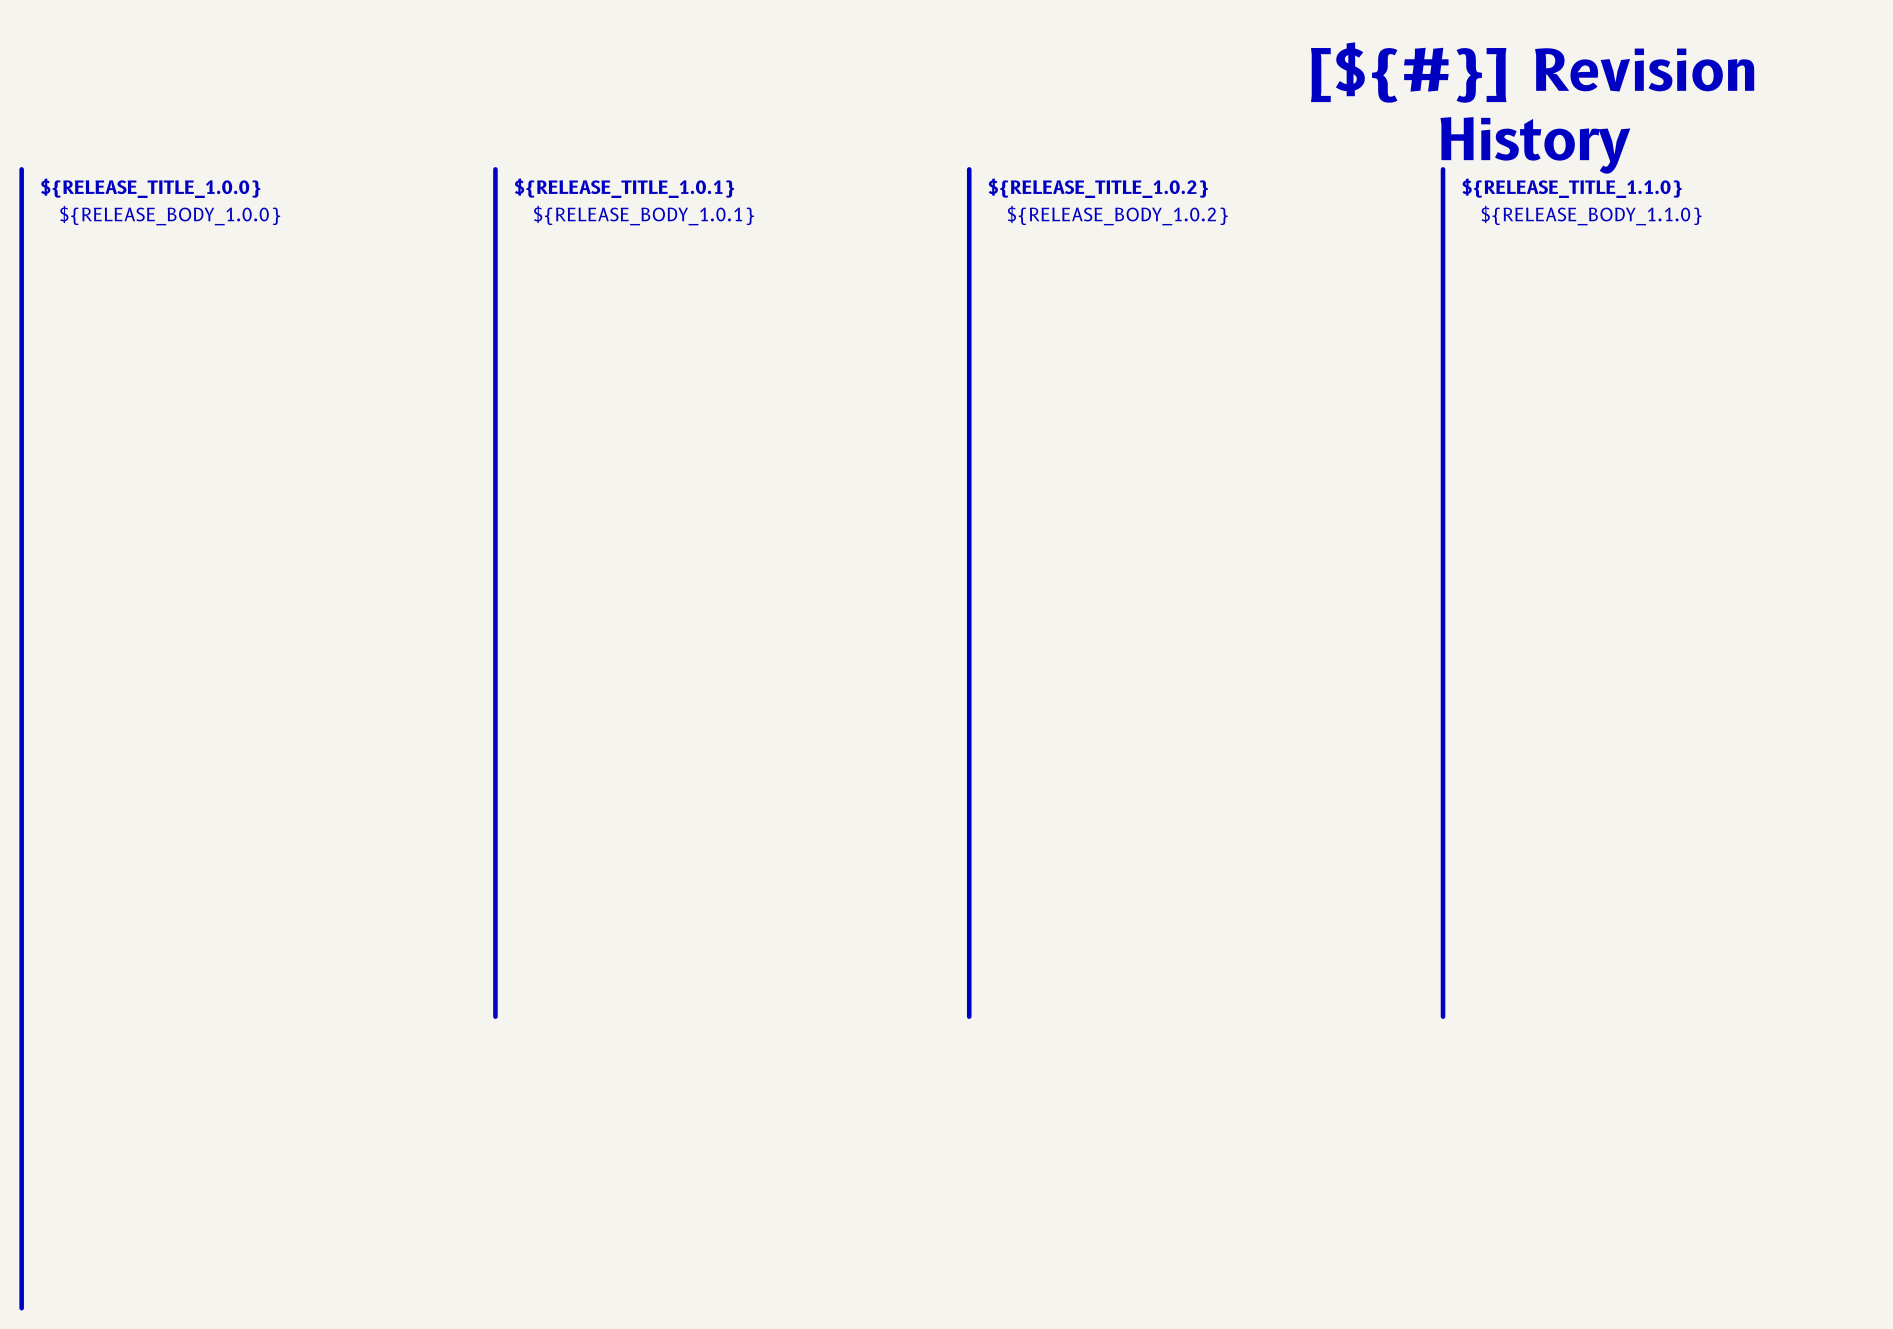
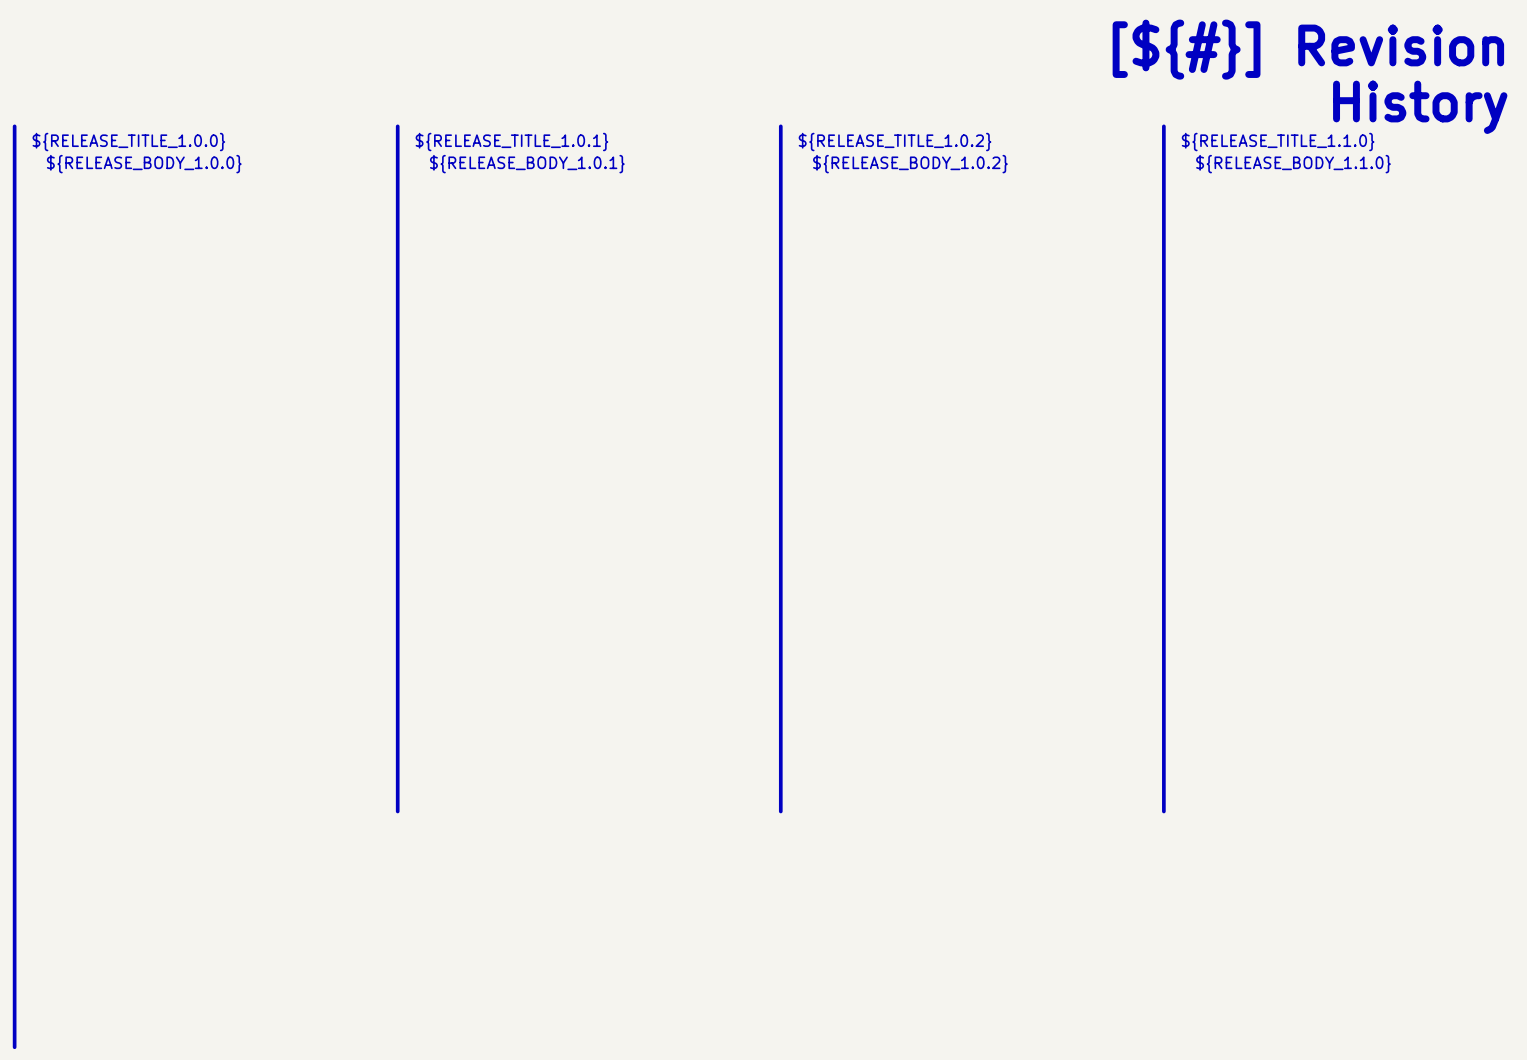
text: [${#}] Revision (1532, 72) -> none
text: none -> [${#}] Revision (1308, 49)
text: History (1535, 145) -> none
text: none -> History (1420, 107)

